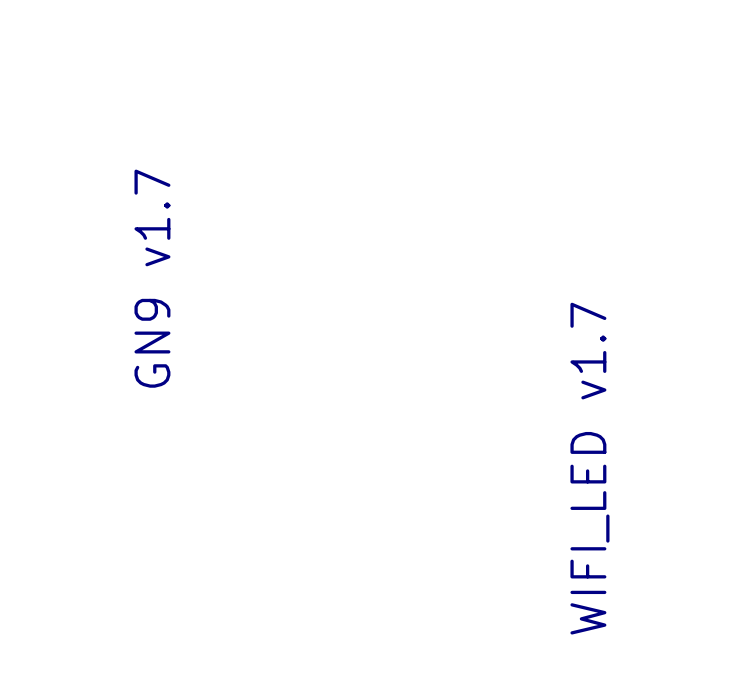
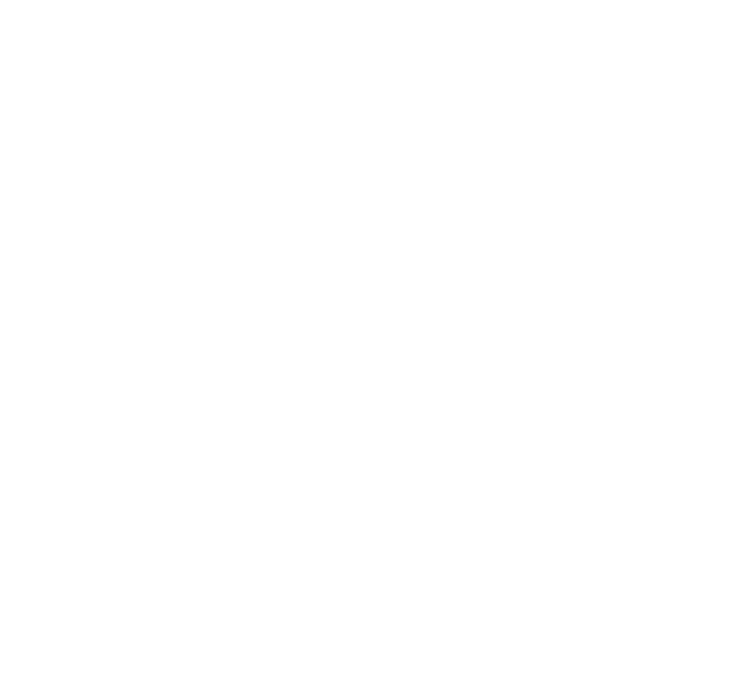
text: GN9 v1.7 (152, 278) -> none
text: WIFI_LED v1.7 (589, 468) -> none

